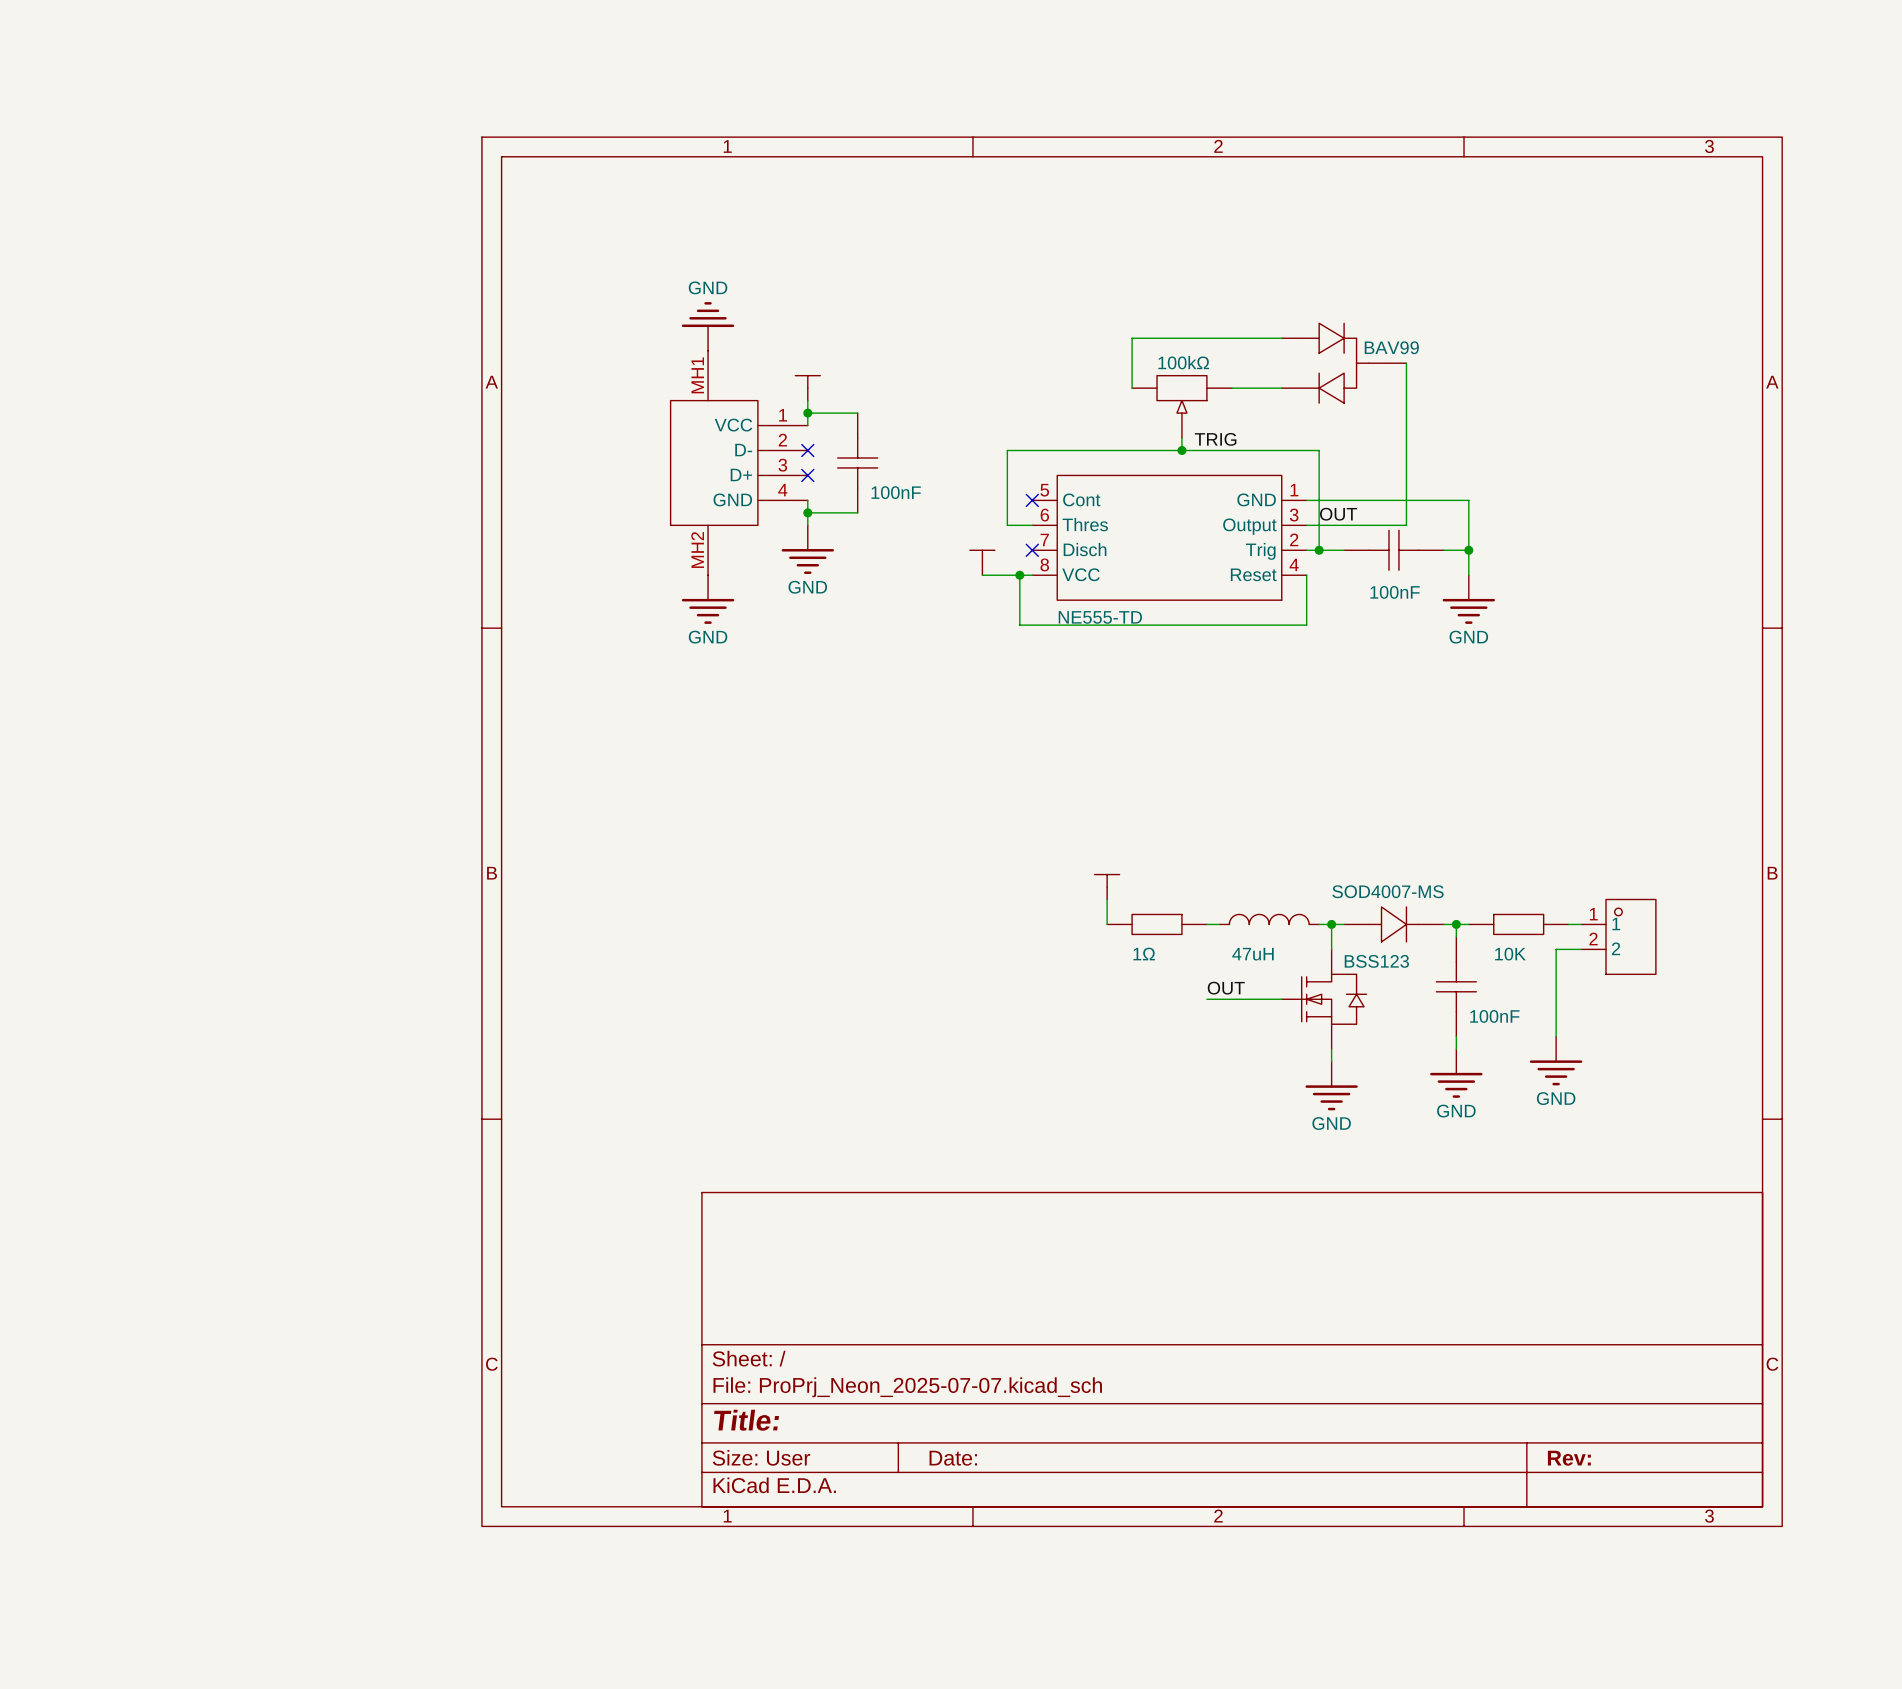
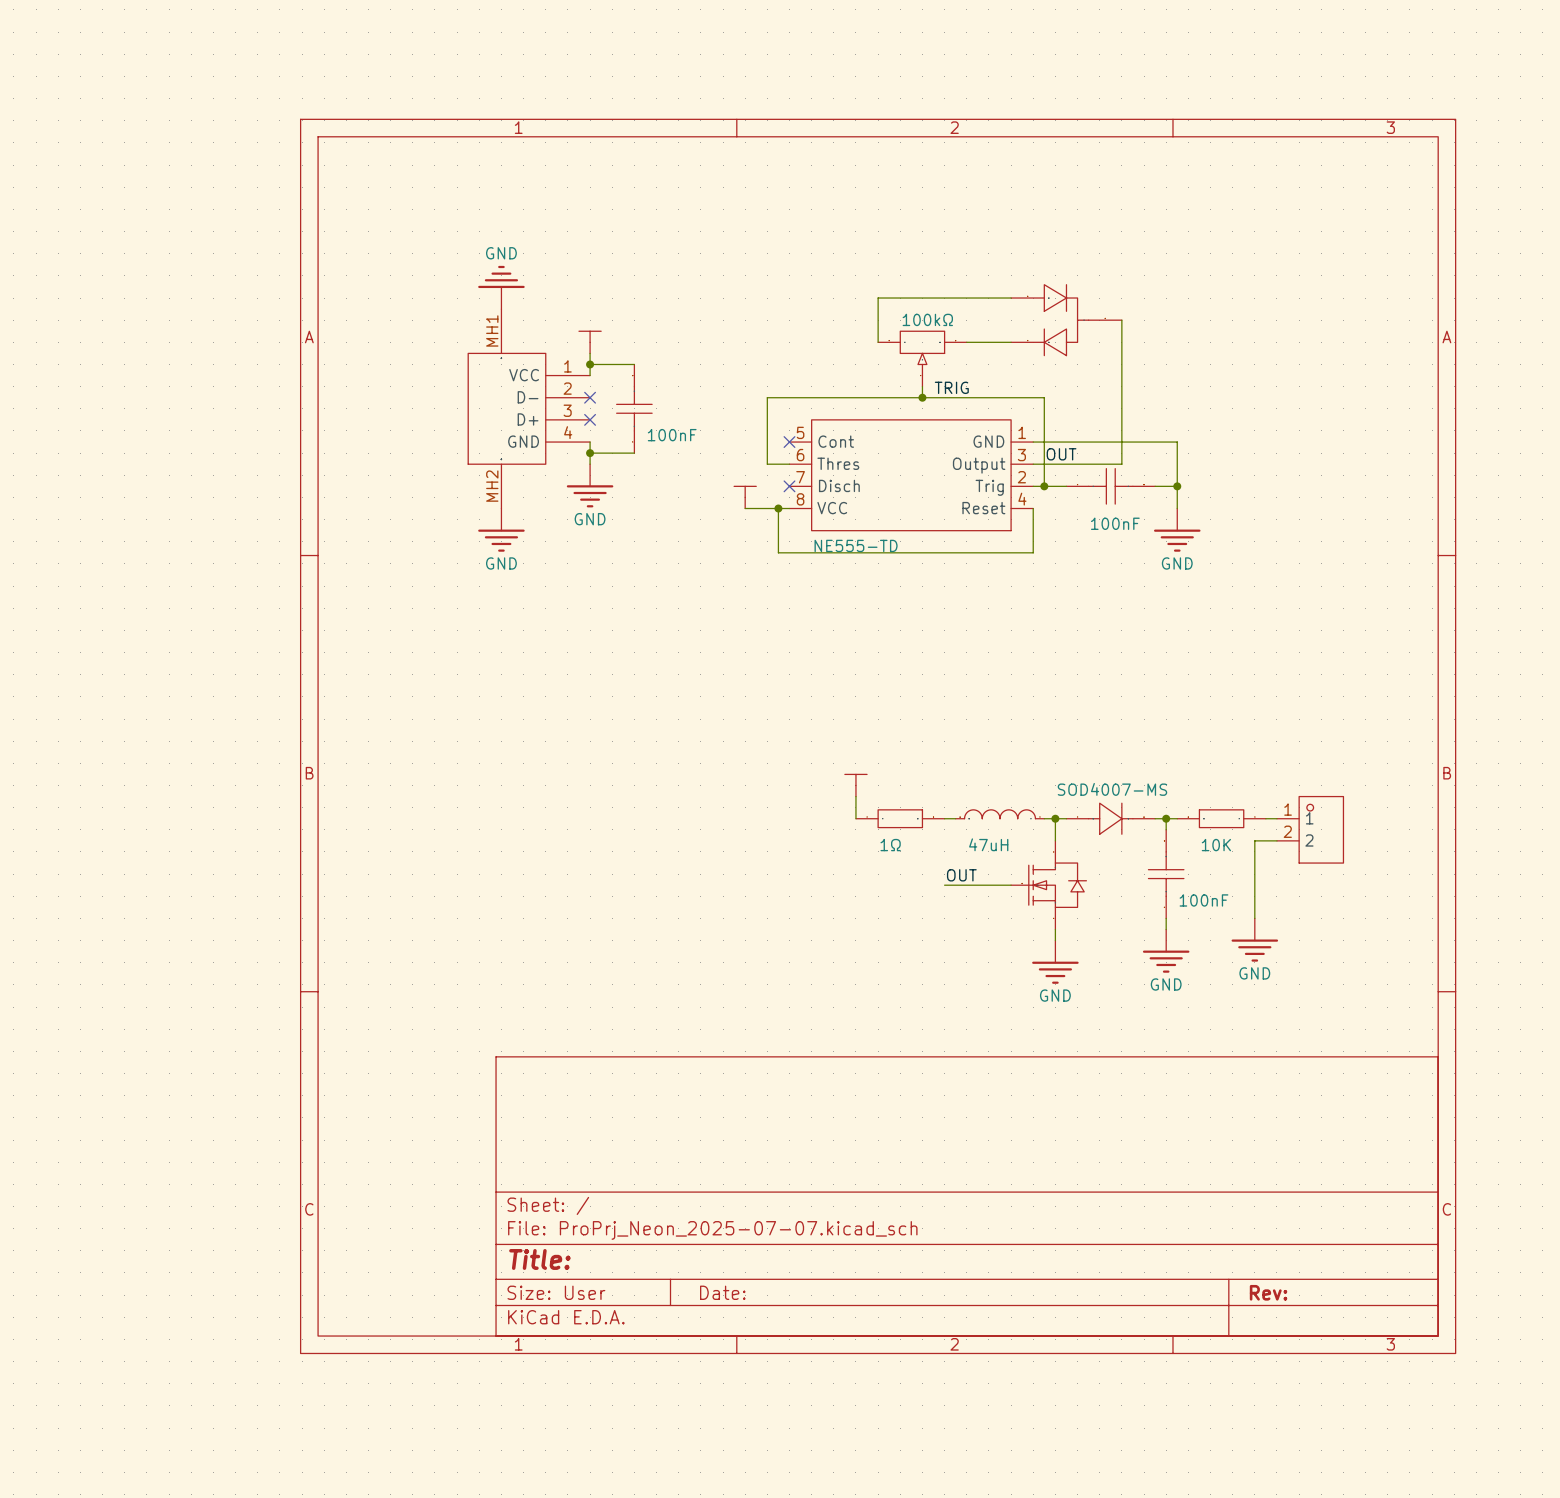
part value: BAV99 (1391, 347) -> none
part value: BSS123 (1376, 961) -> none

